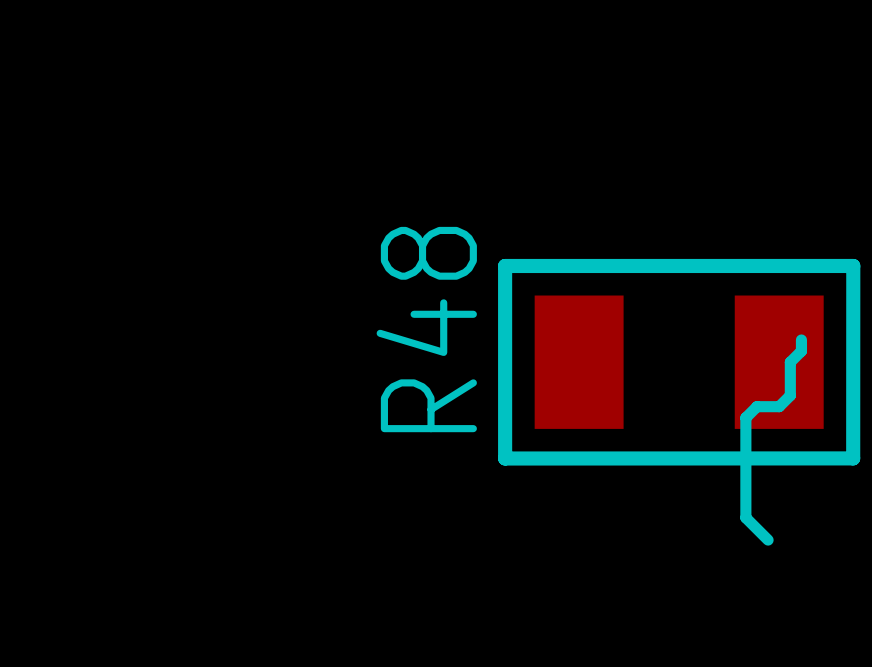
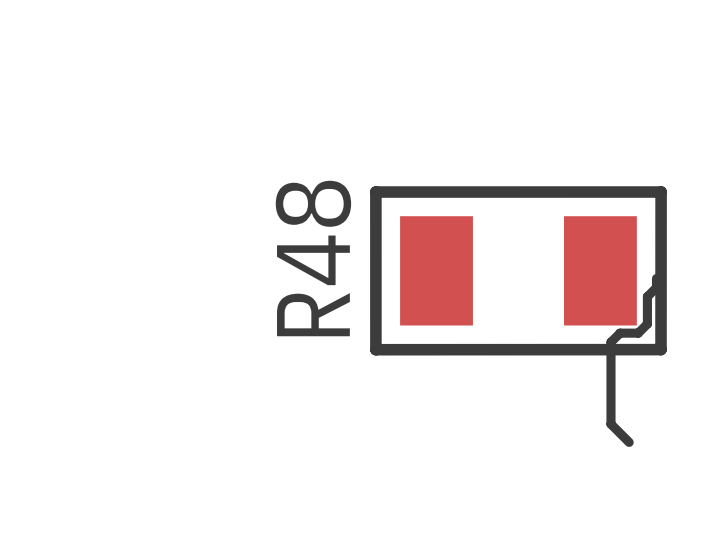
R48 position: (679, 362) -> (518, 270)

